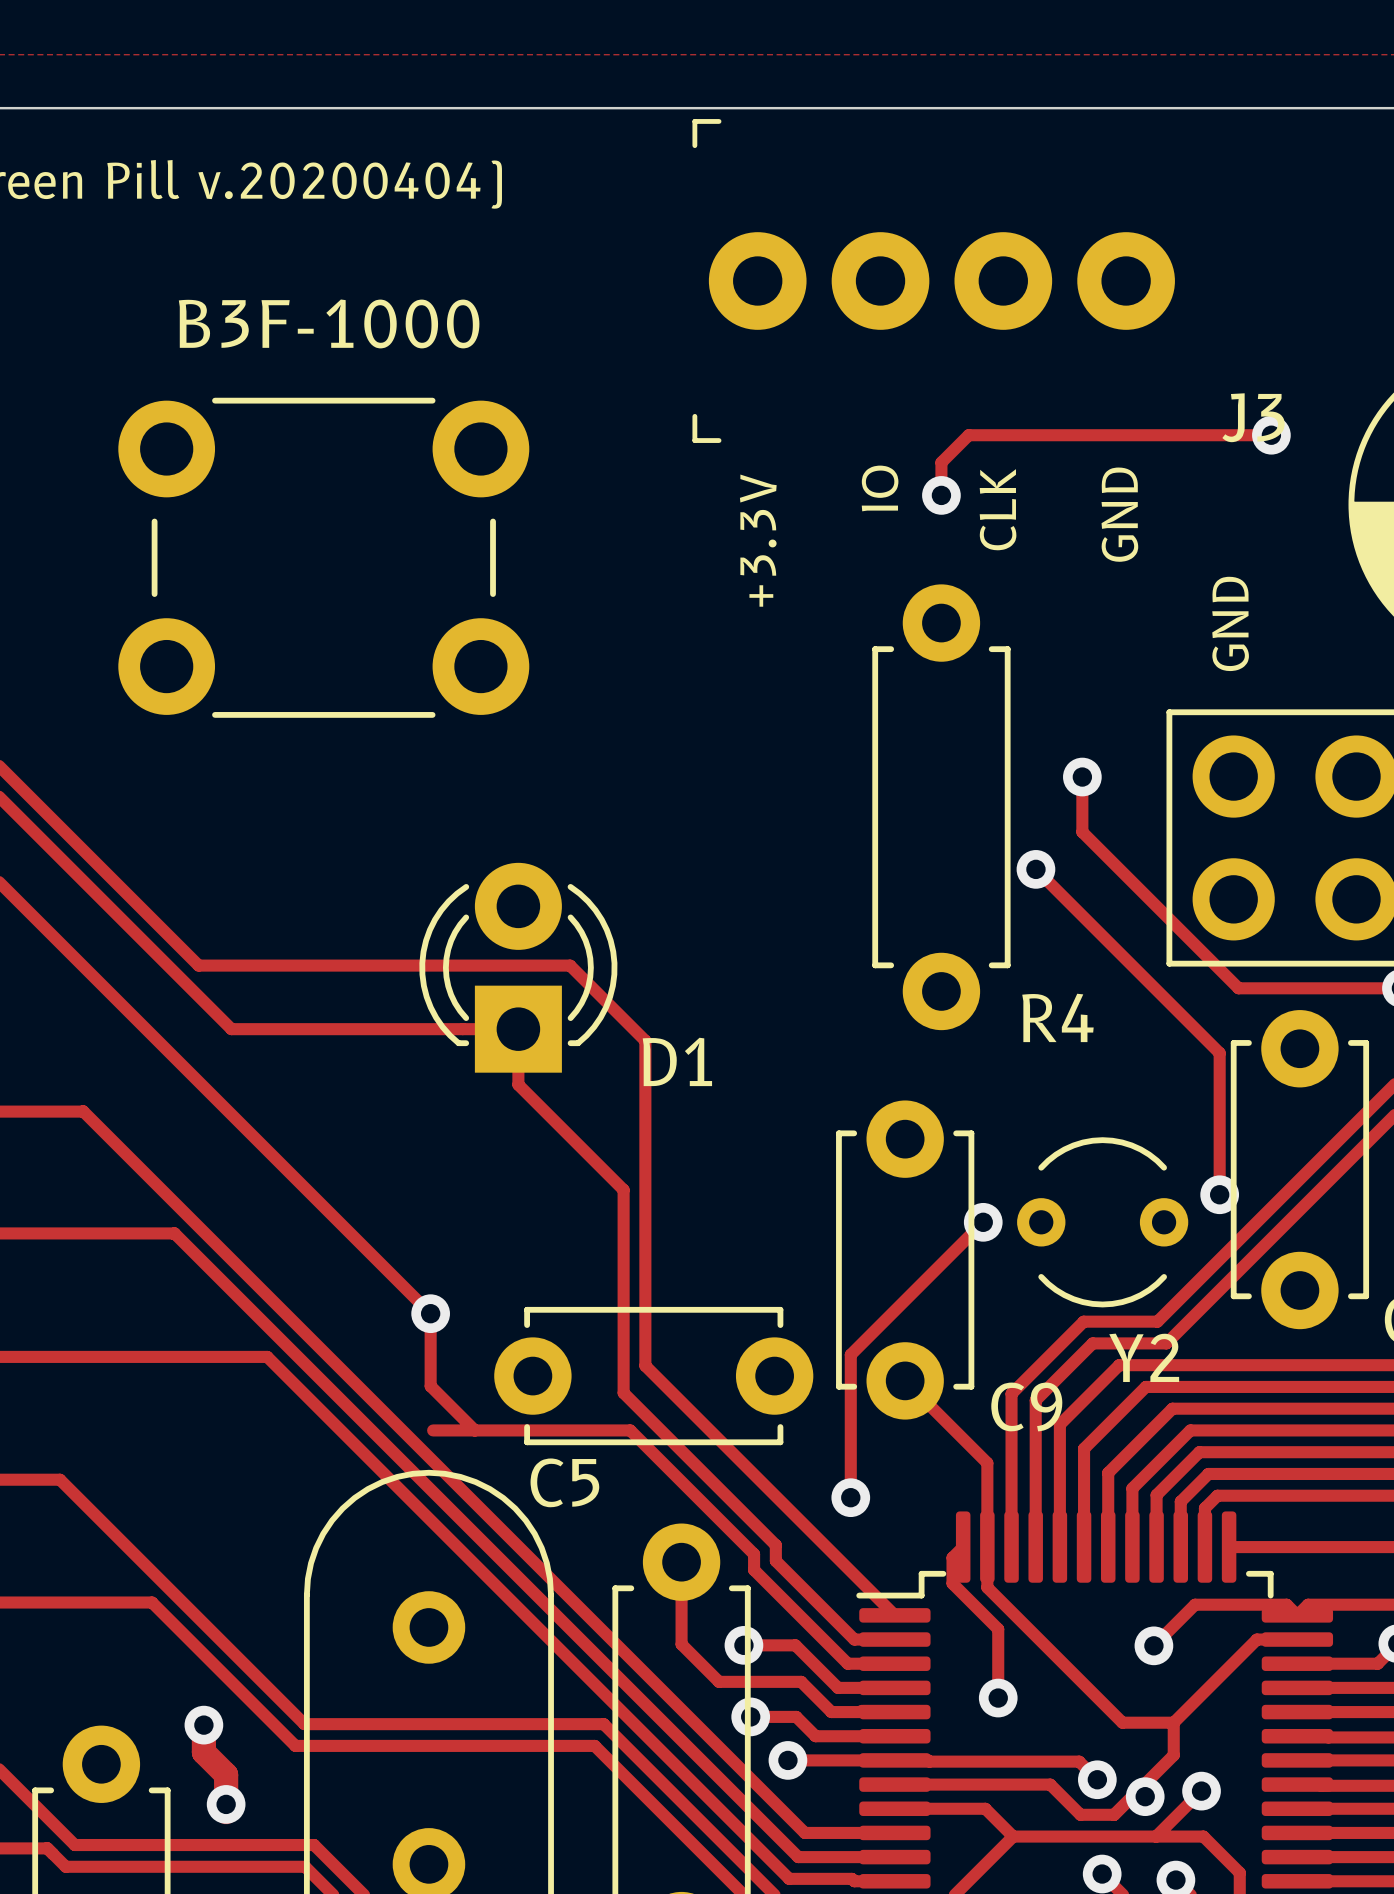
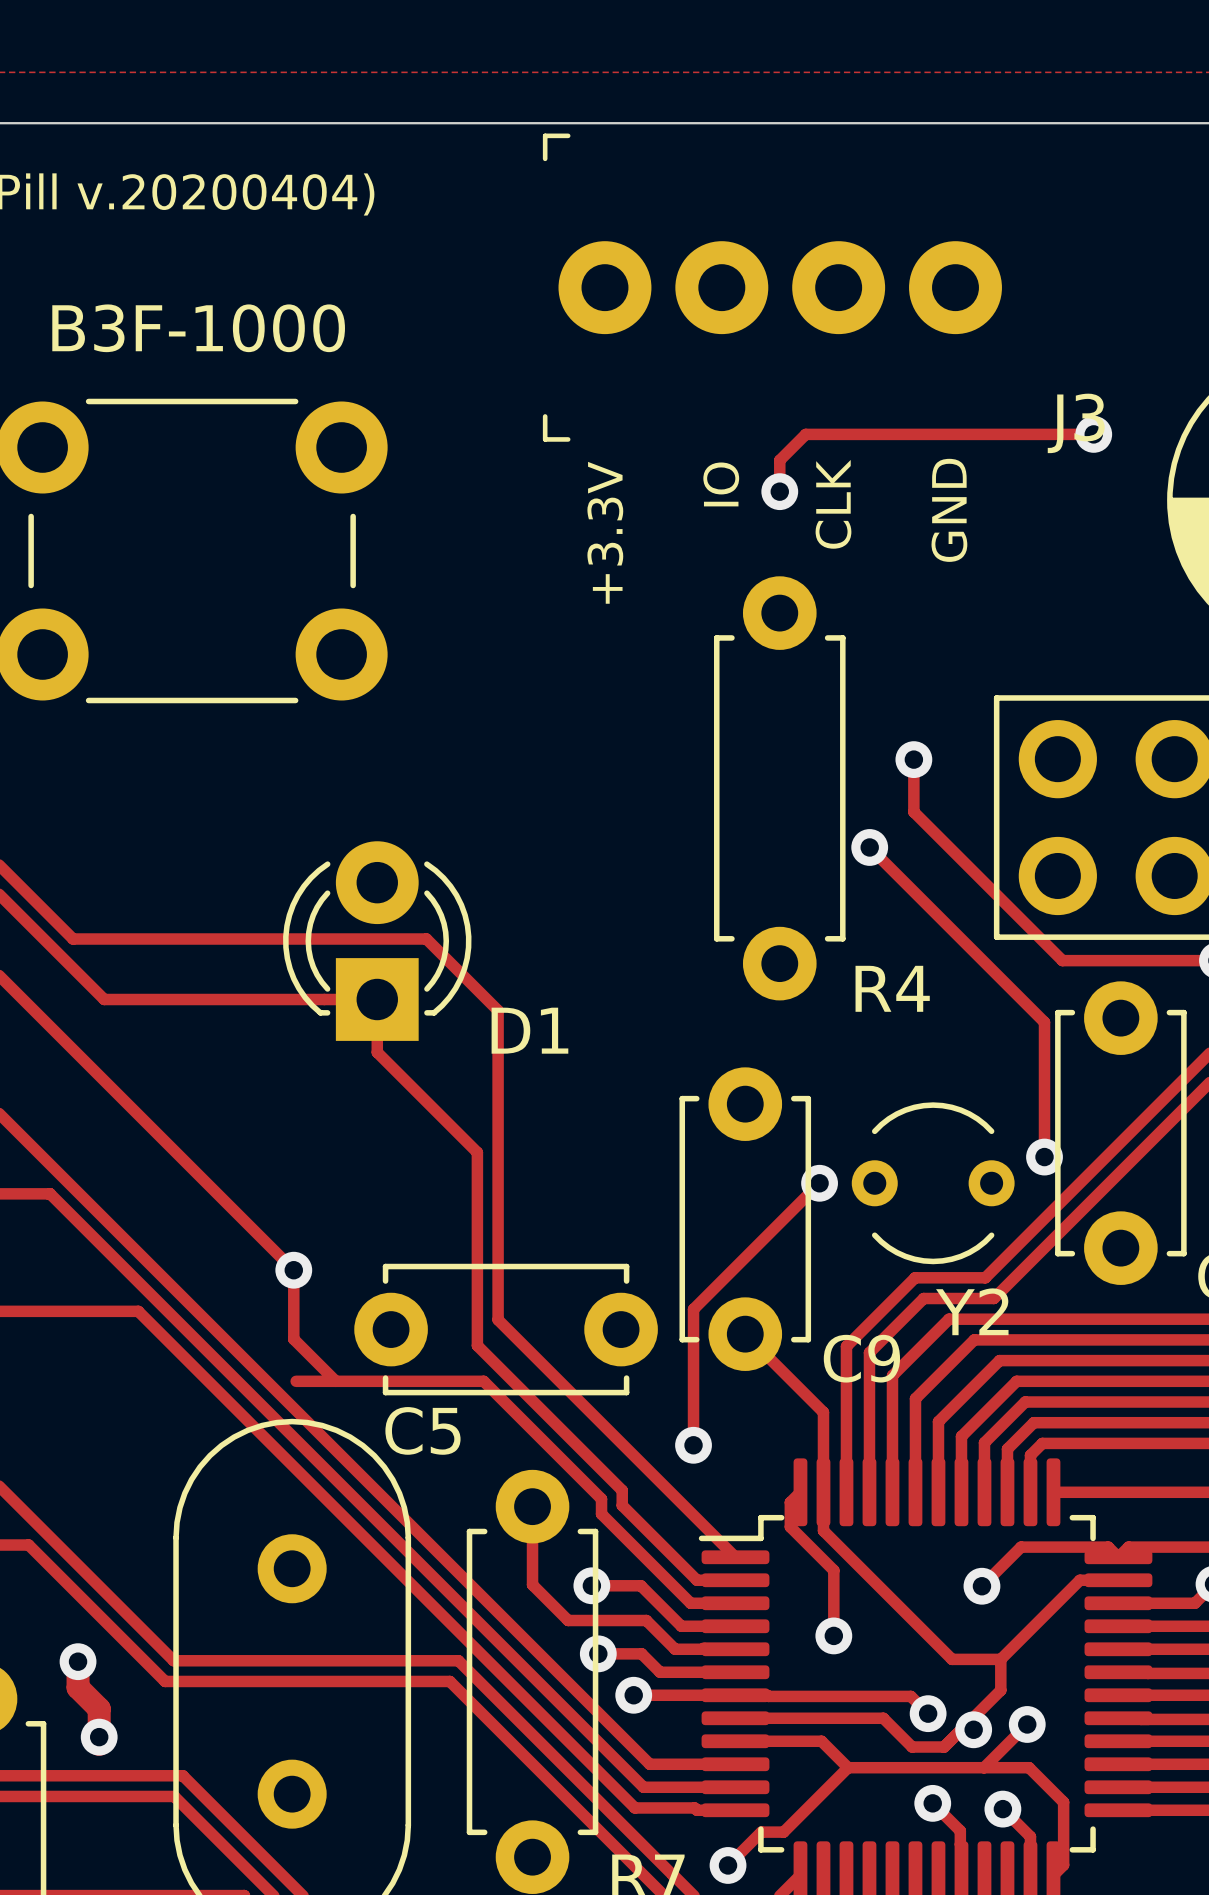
text: GND (1230, 623) -> none

